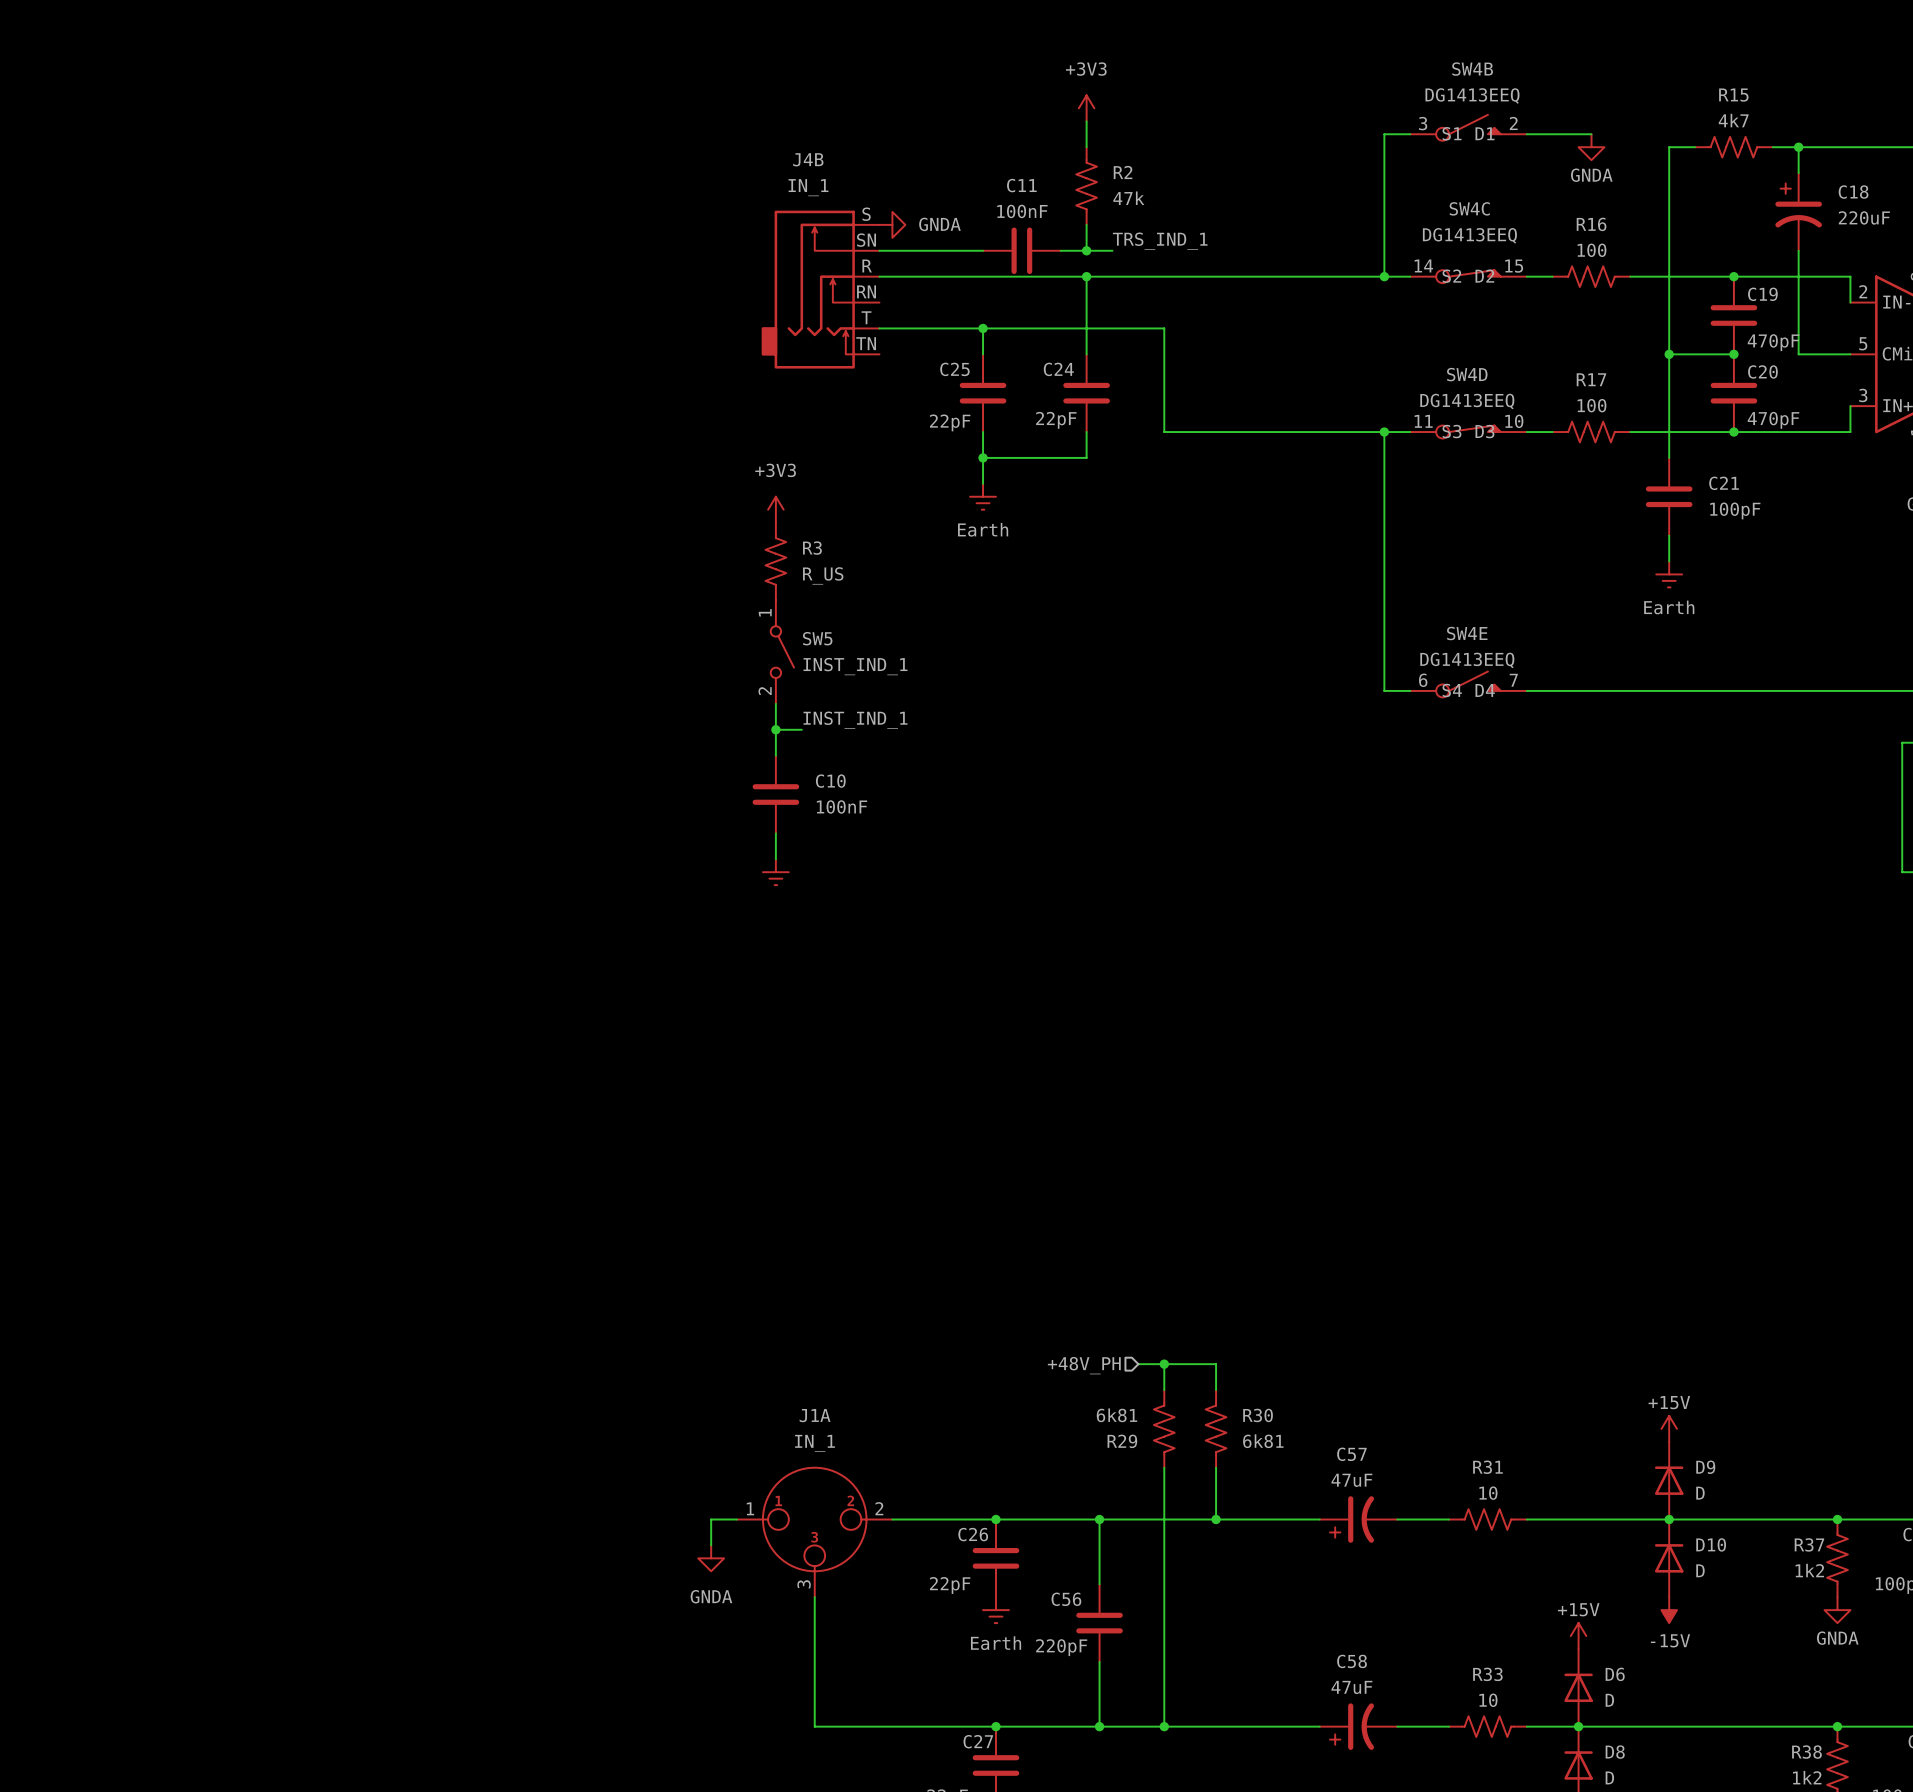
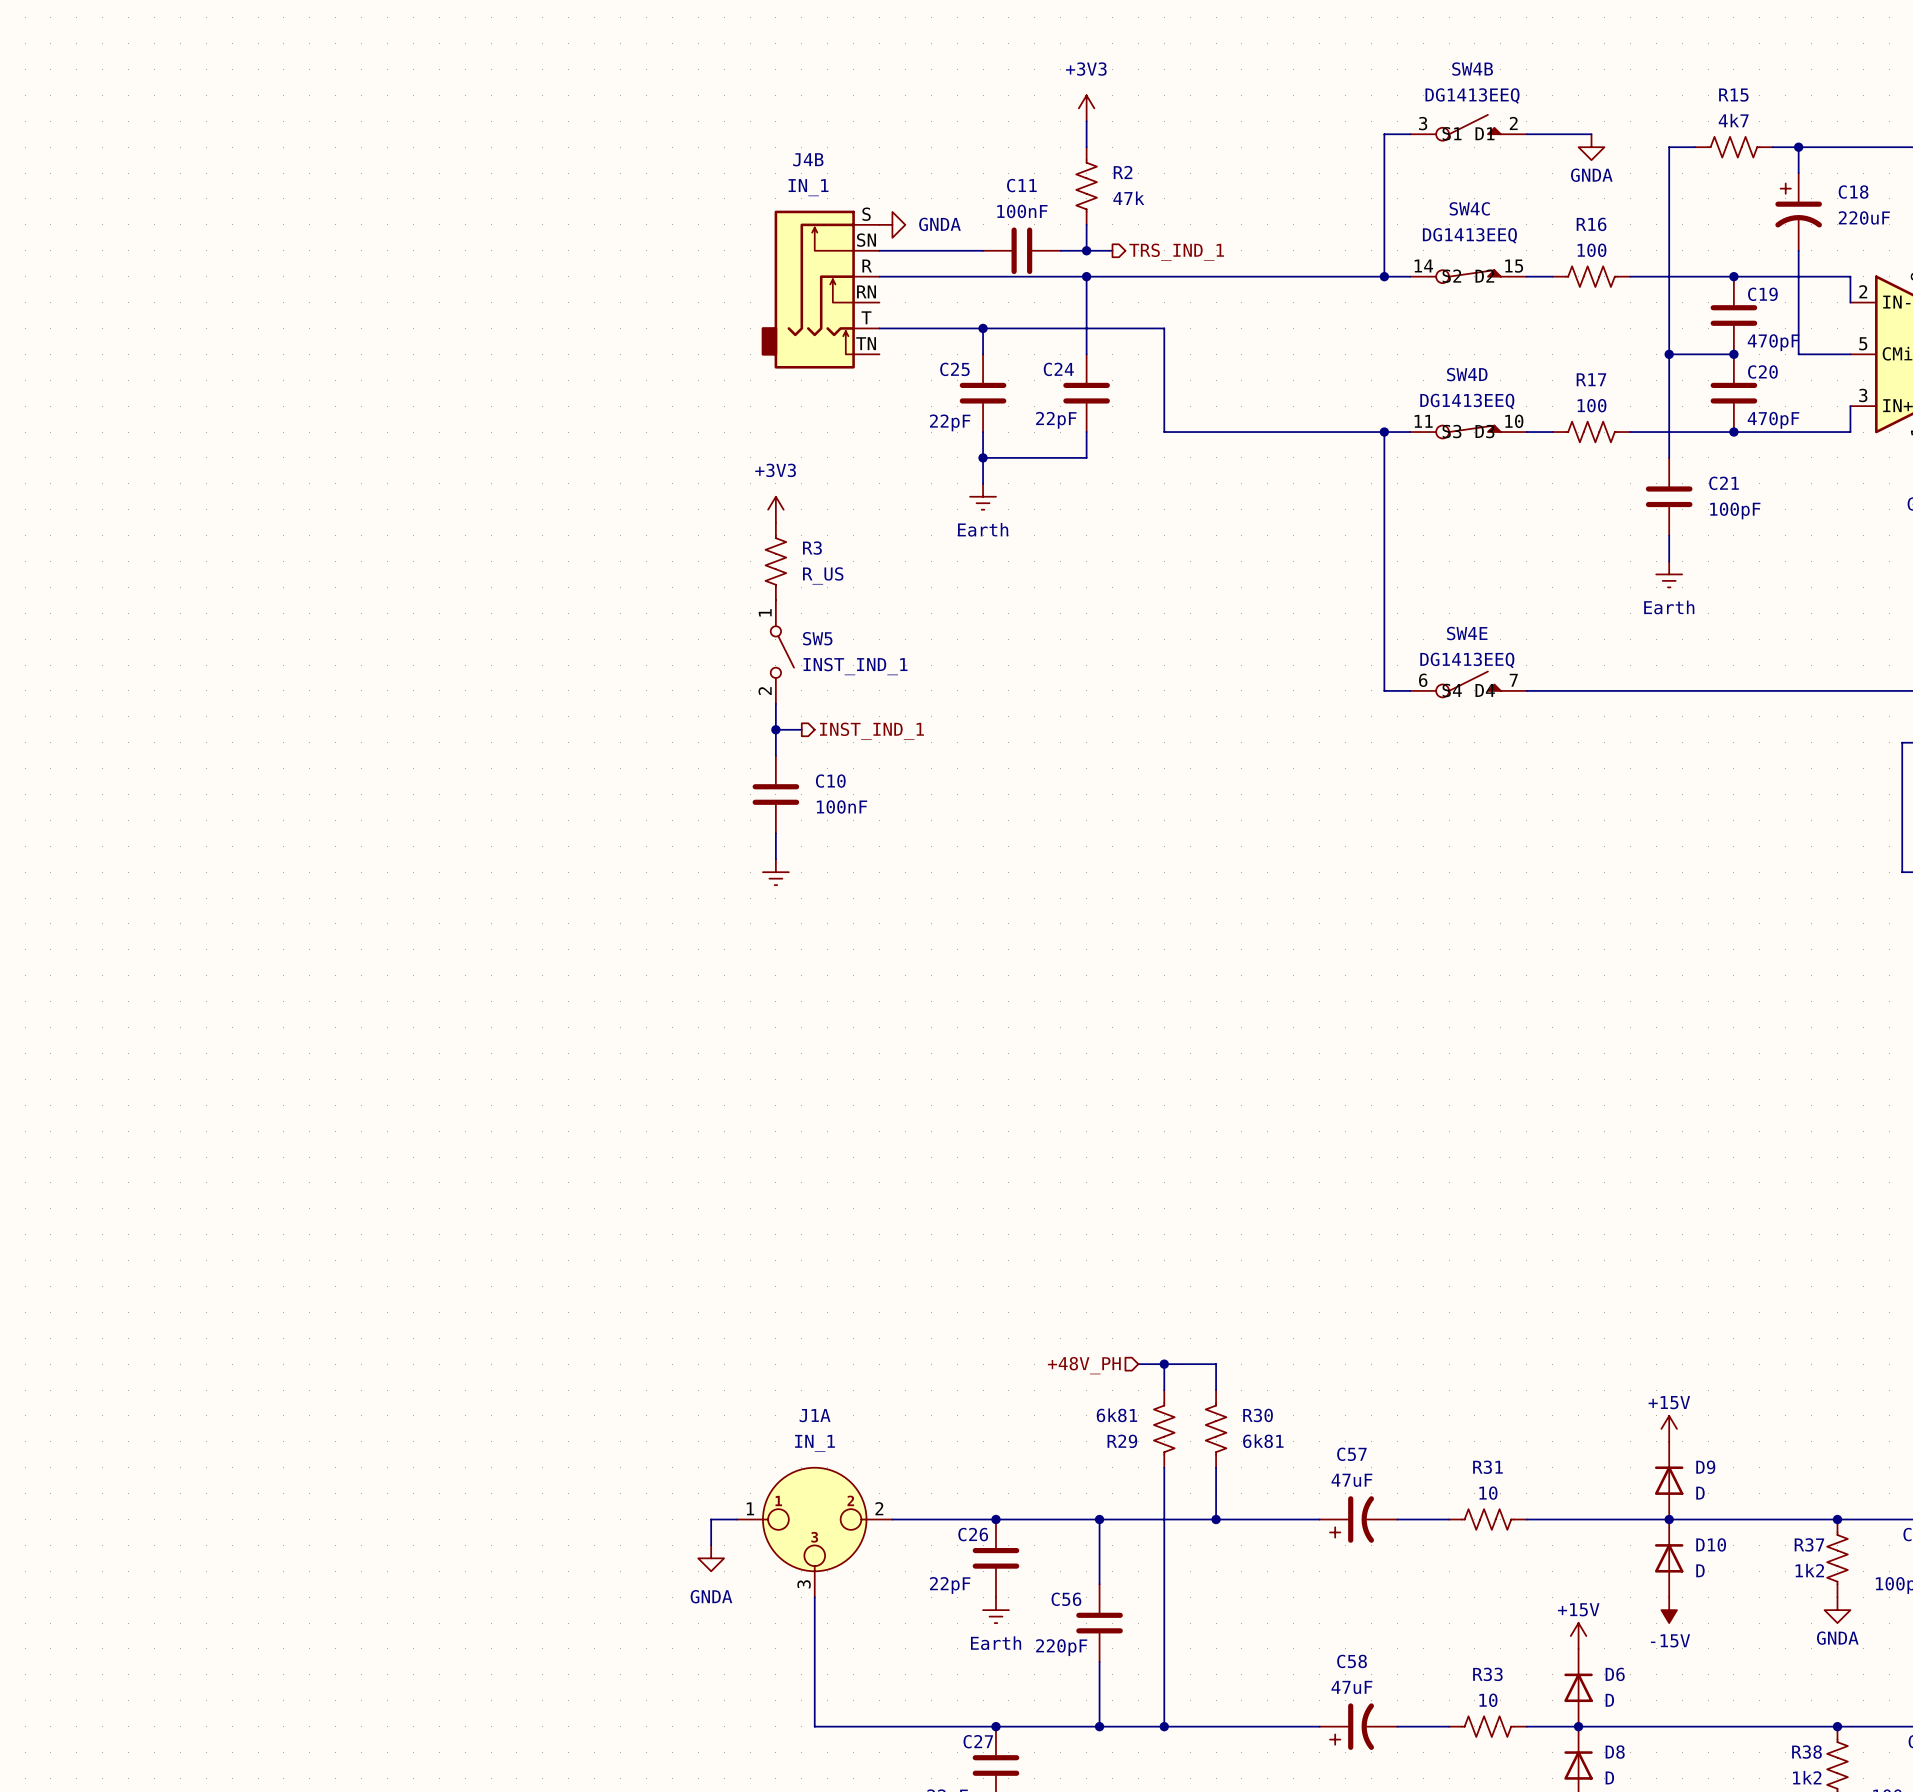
label: TRS_IND_1 (1160, 241) -> none
hierarchical label: none -> TRS_IND_1 (1176, 252)
label: INST_IND_1 (855, 720) -> none
hierarchical label: none -> INST_IND_1 (871, 731)

